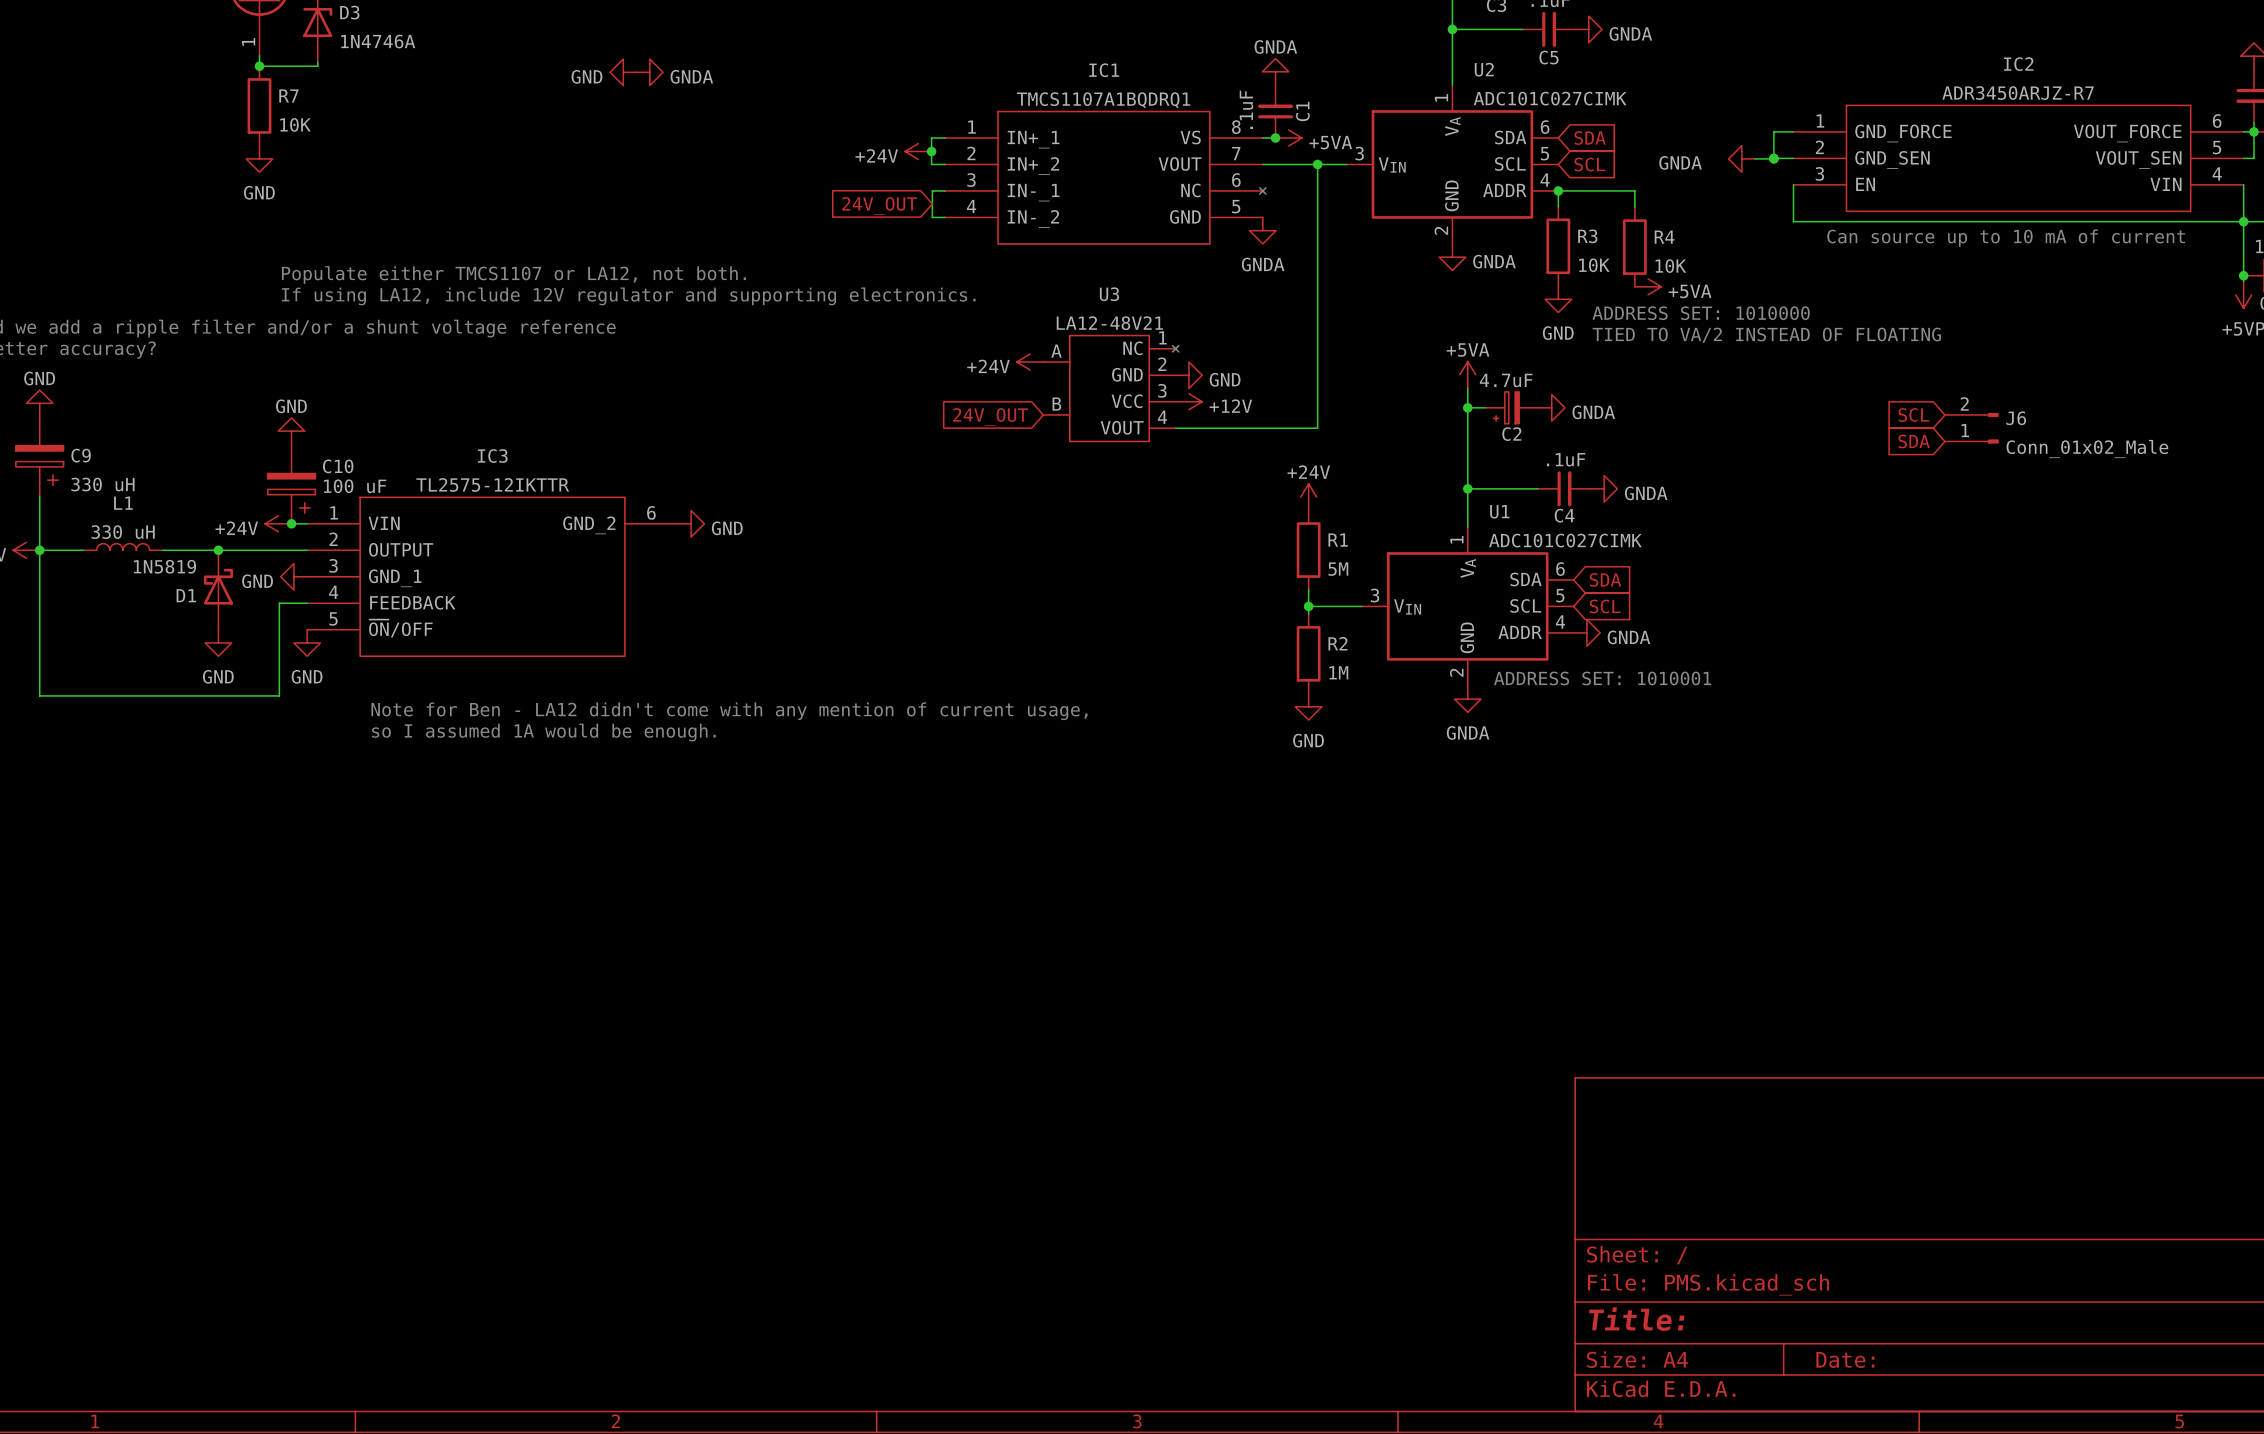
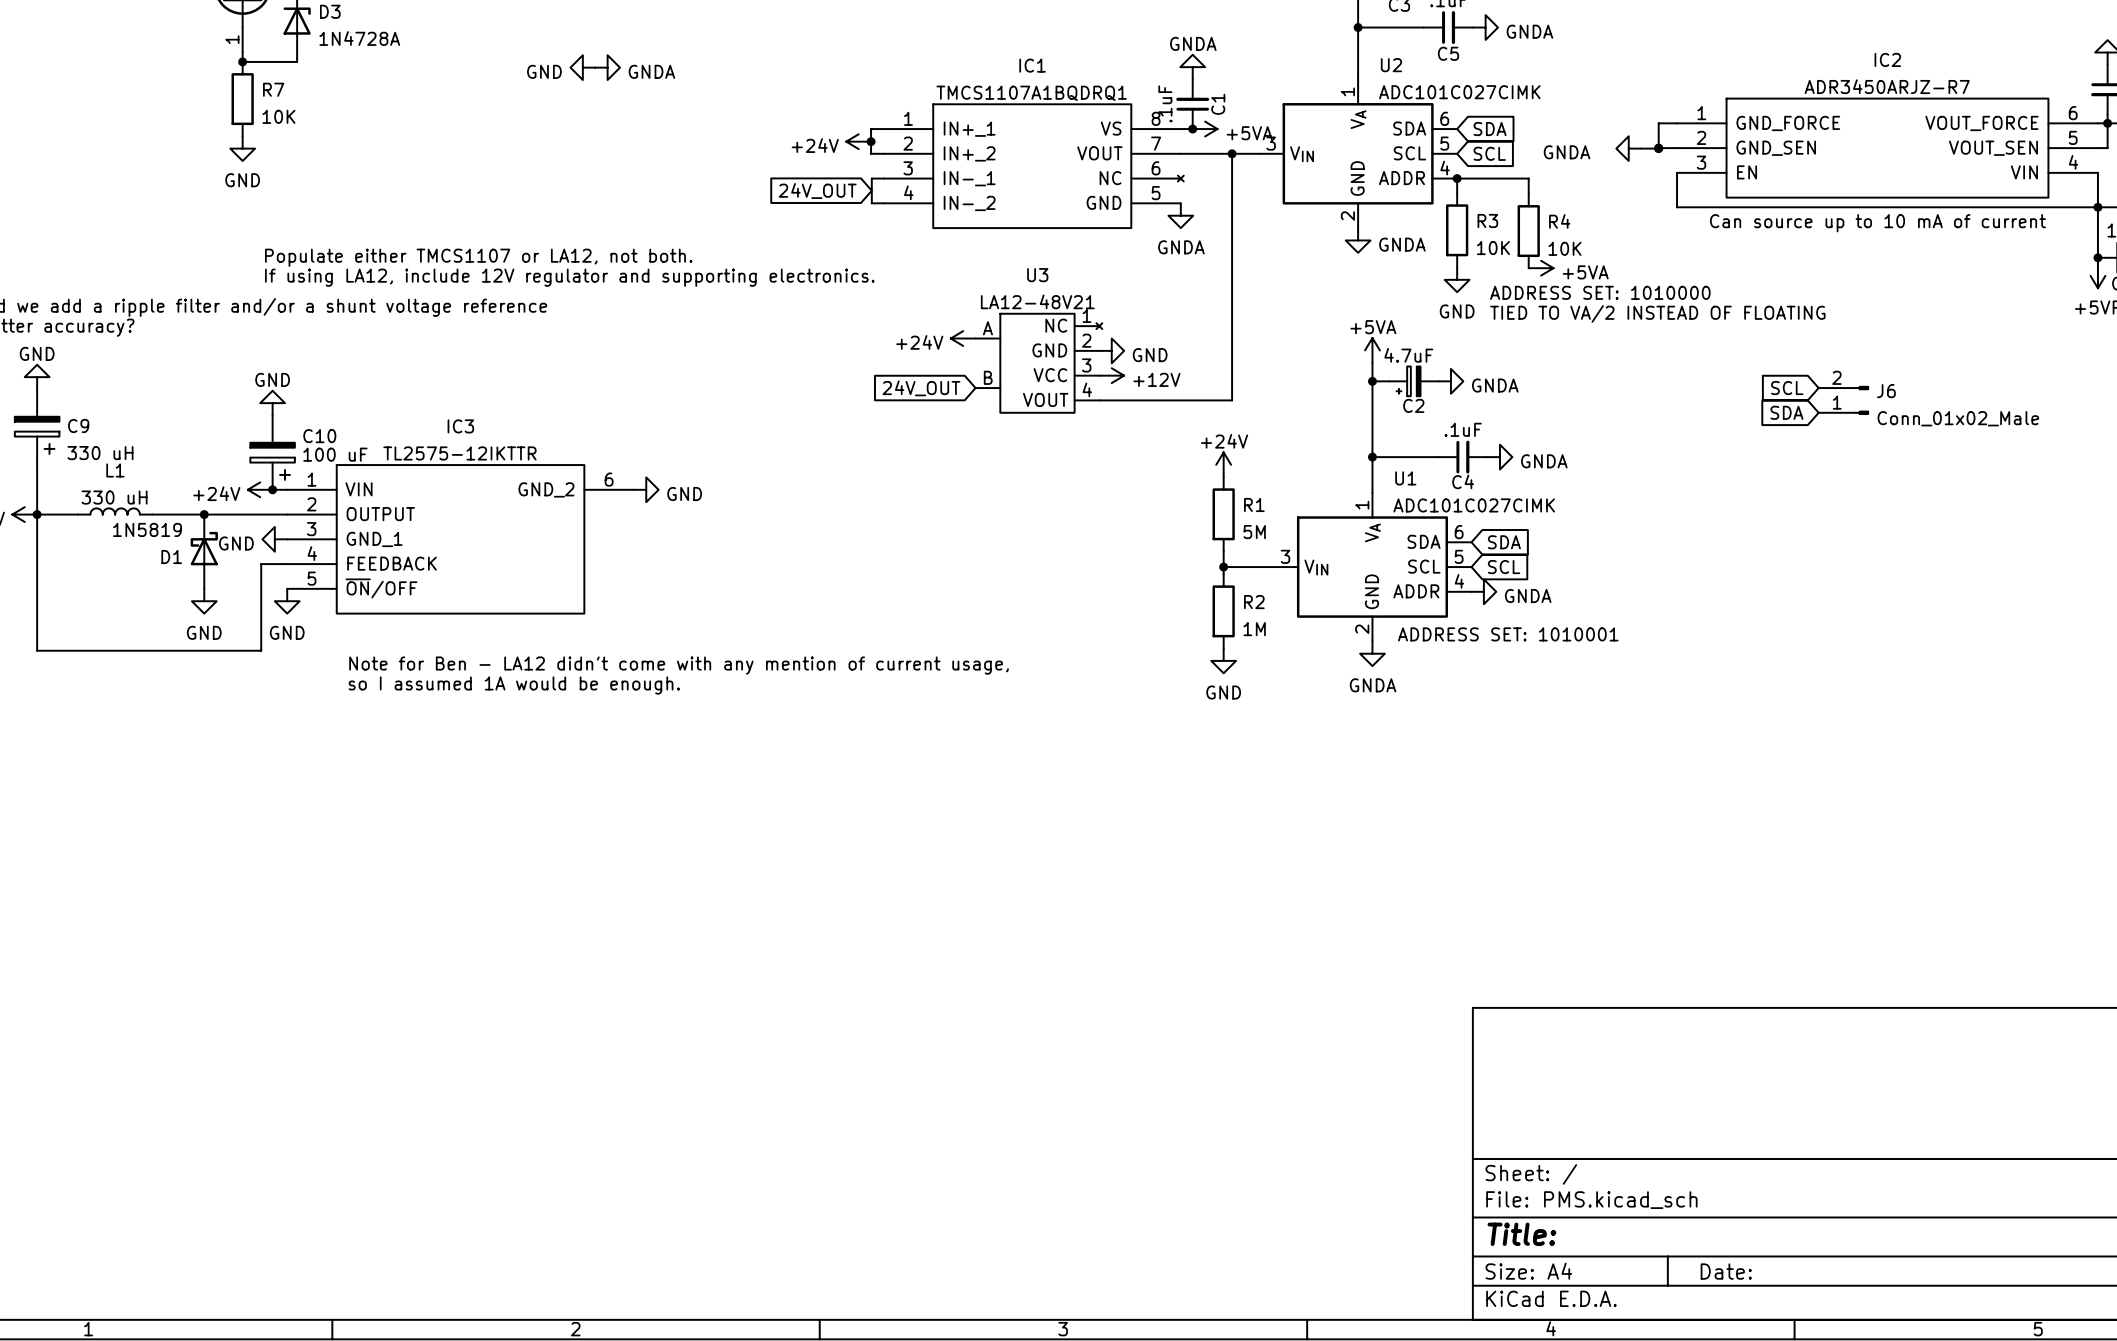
D3 value: 1N4746A (378, 41) -> 1N4728A (359, 38)

